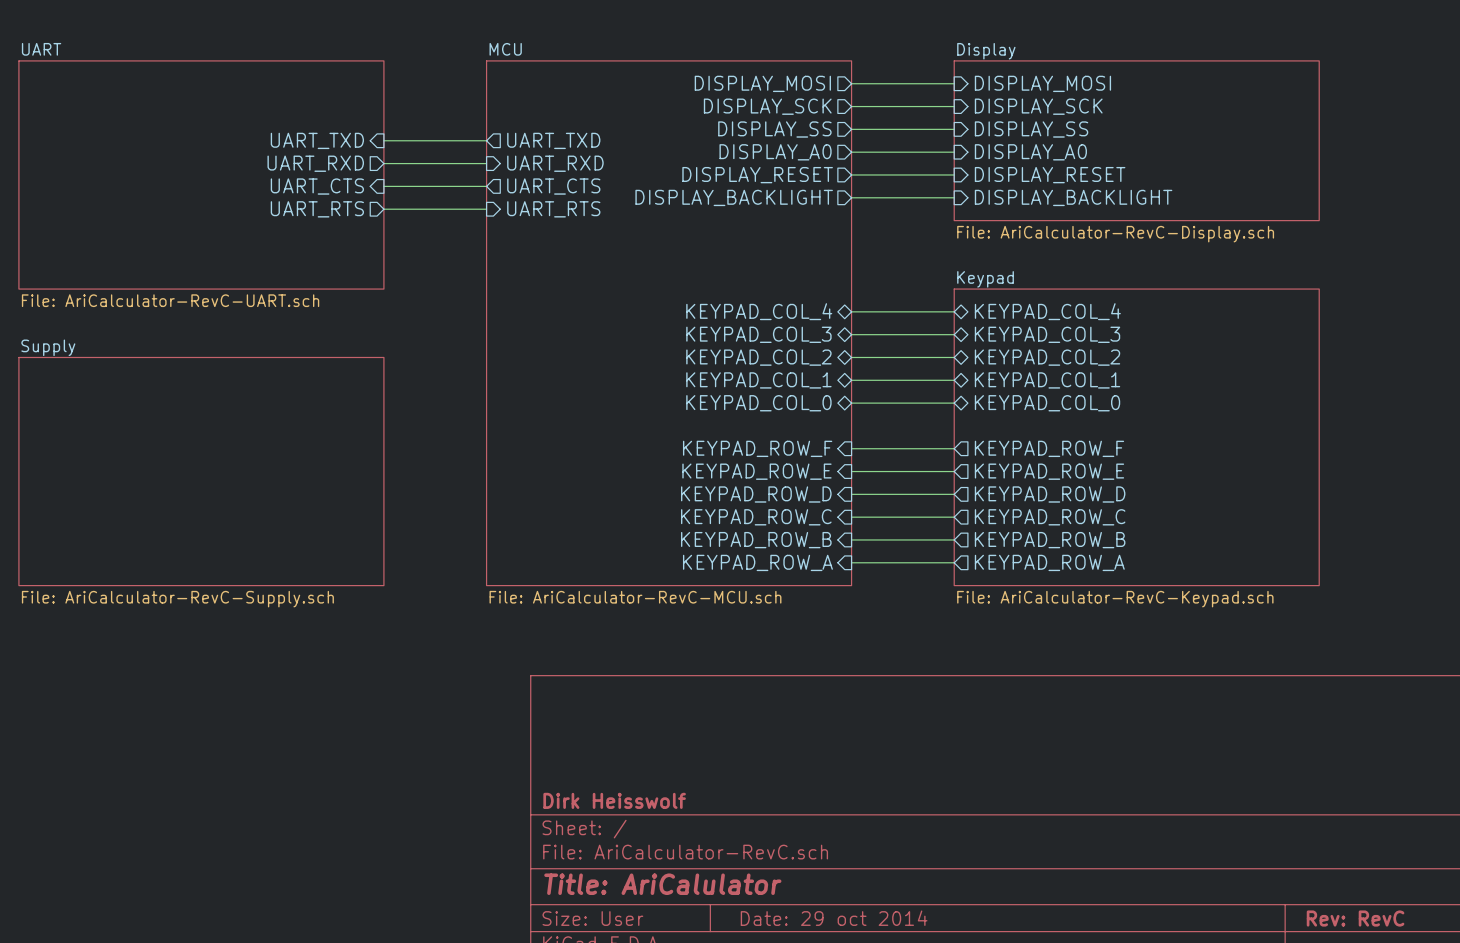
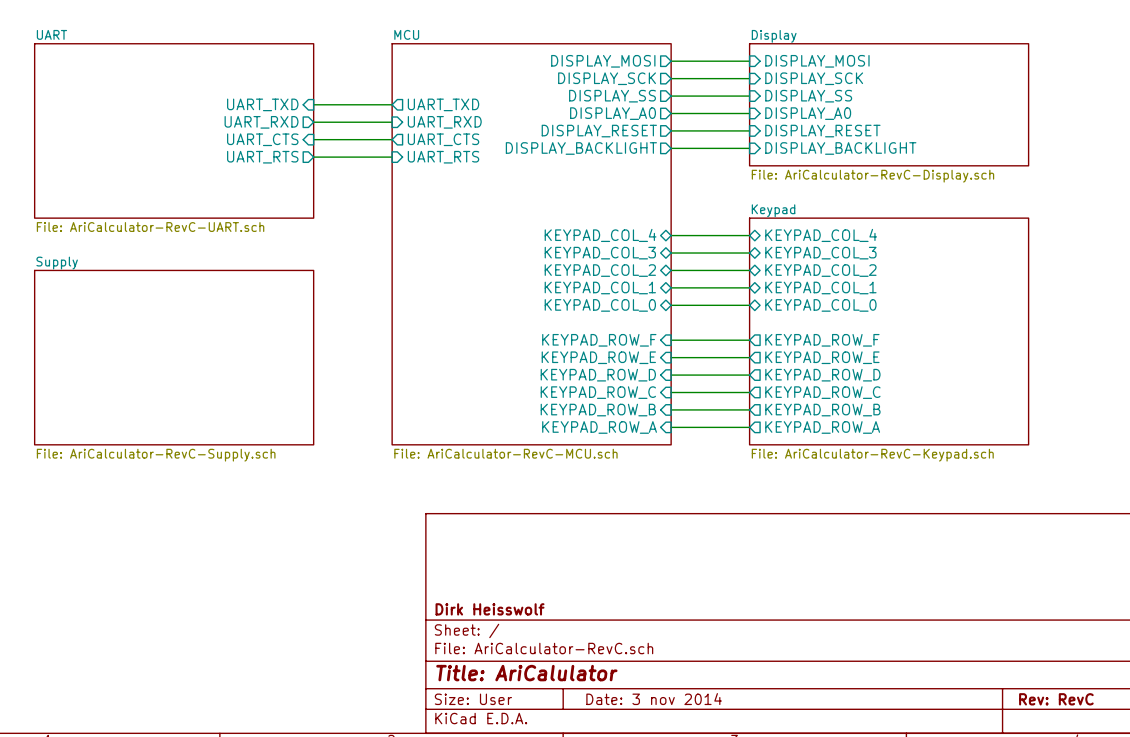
title block: Date: 29 oct 2014 (834, 918) -> Date: 3 nov 2014 (654, 699)

